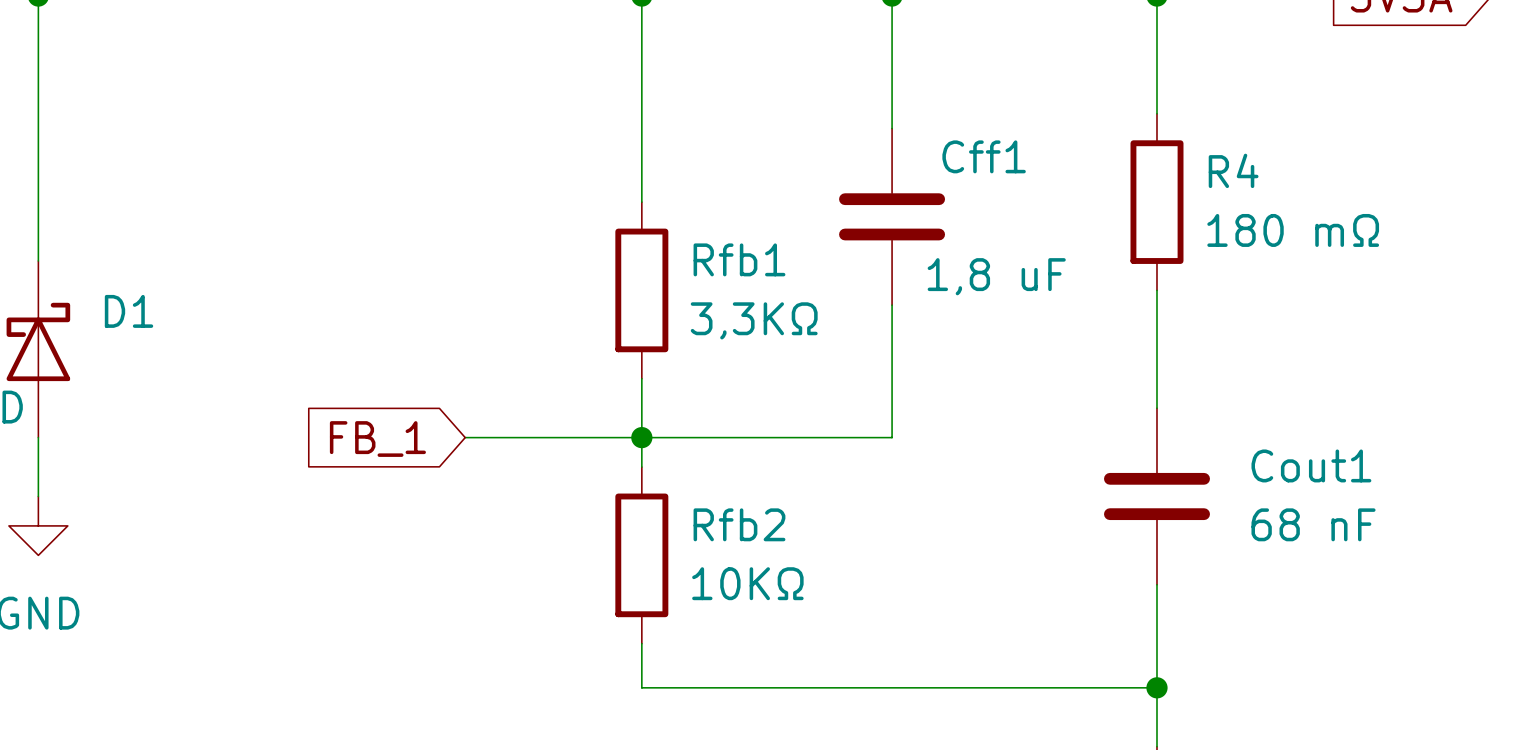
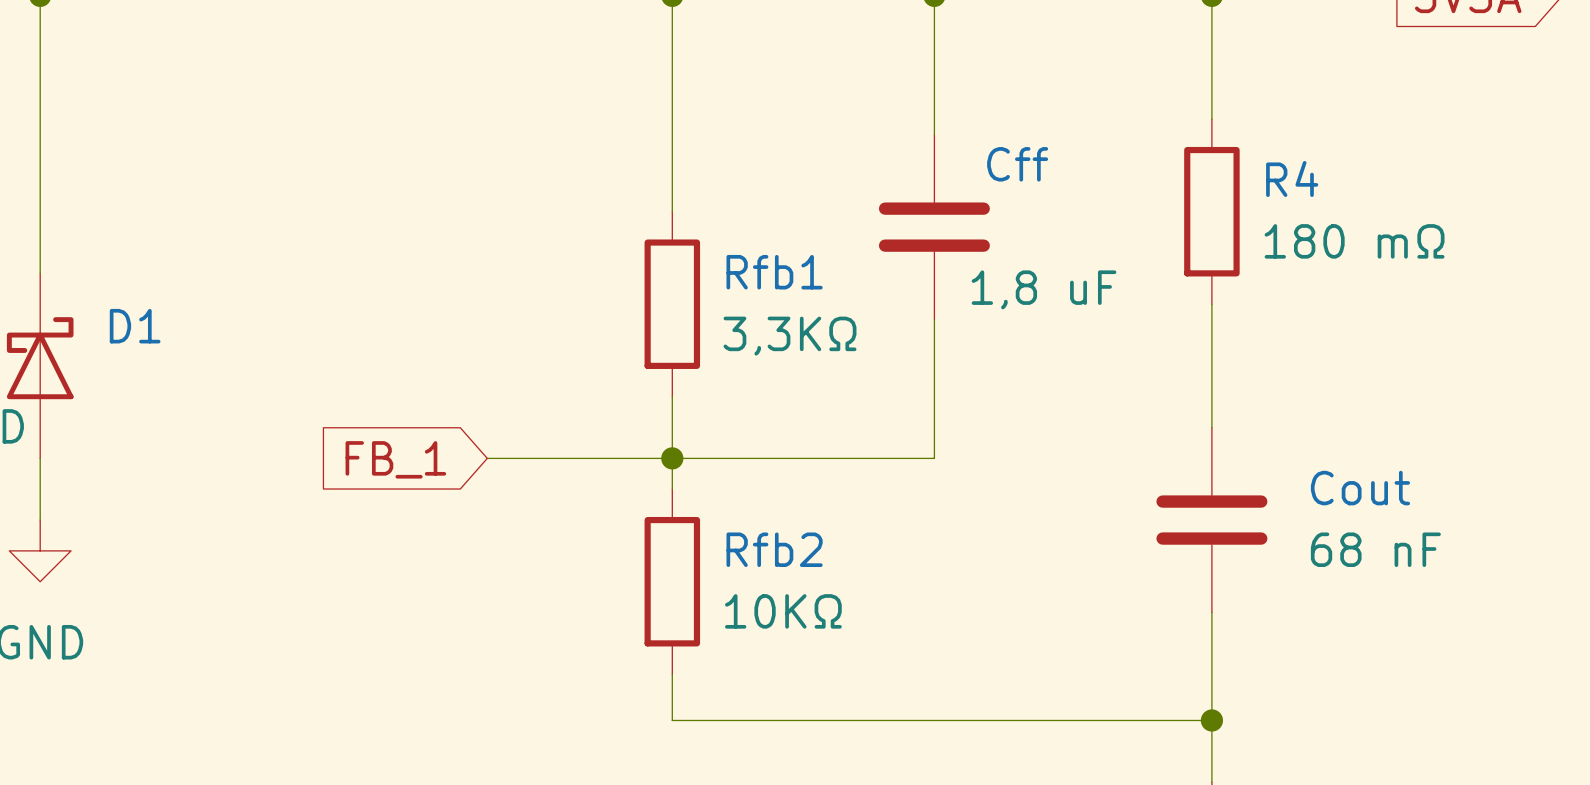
Cff1 name: Cff1 (984, 156) -> Cff (1017, 164)
Cout1 name: Cout1 (1311, 465) -> Cout (1360, 488)

